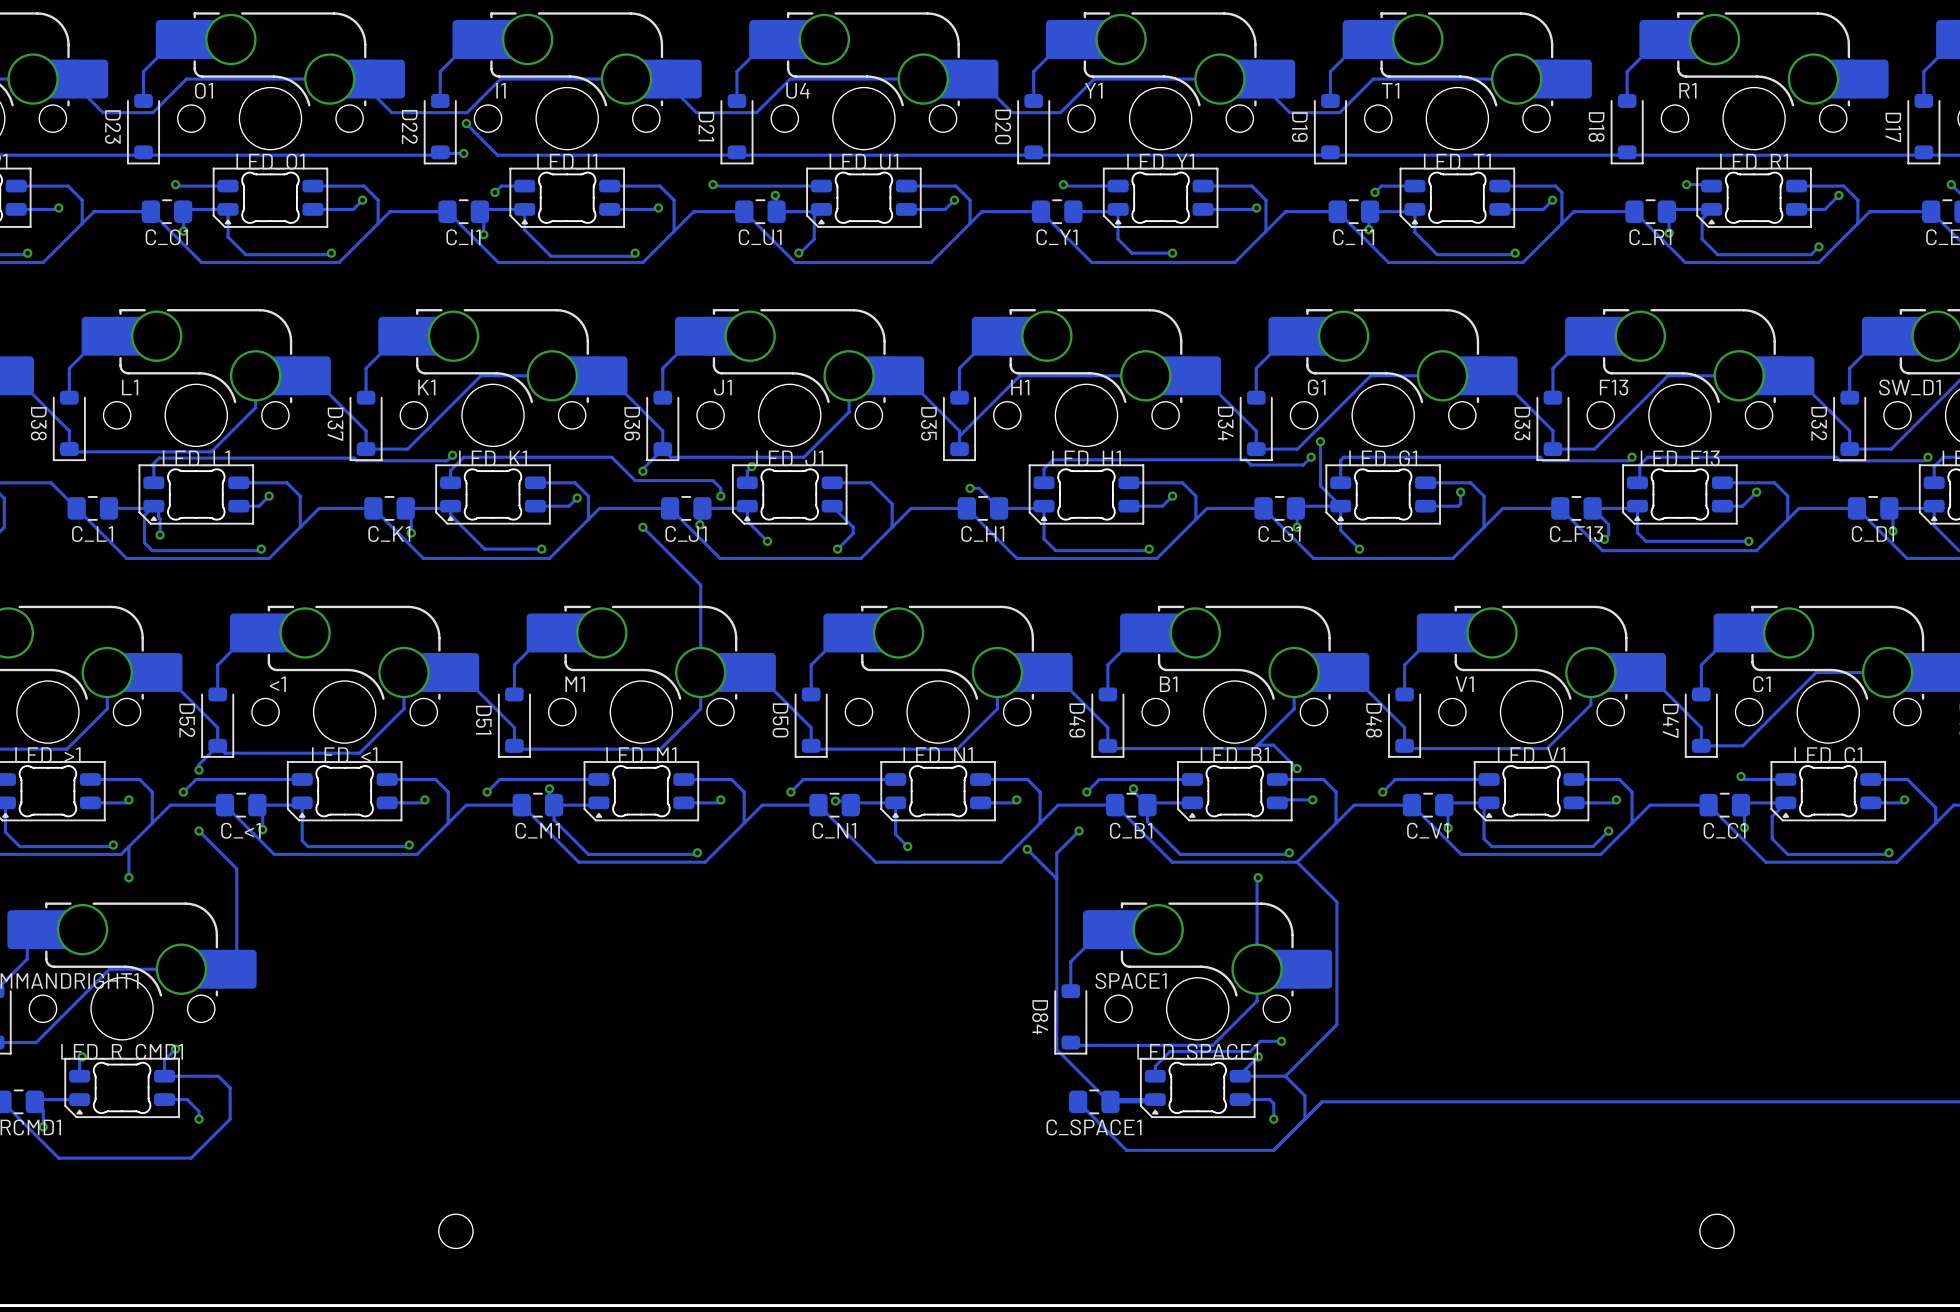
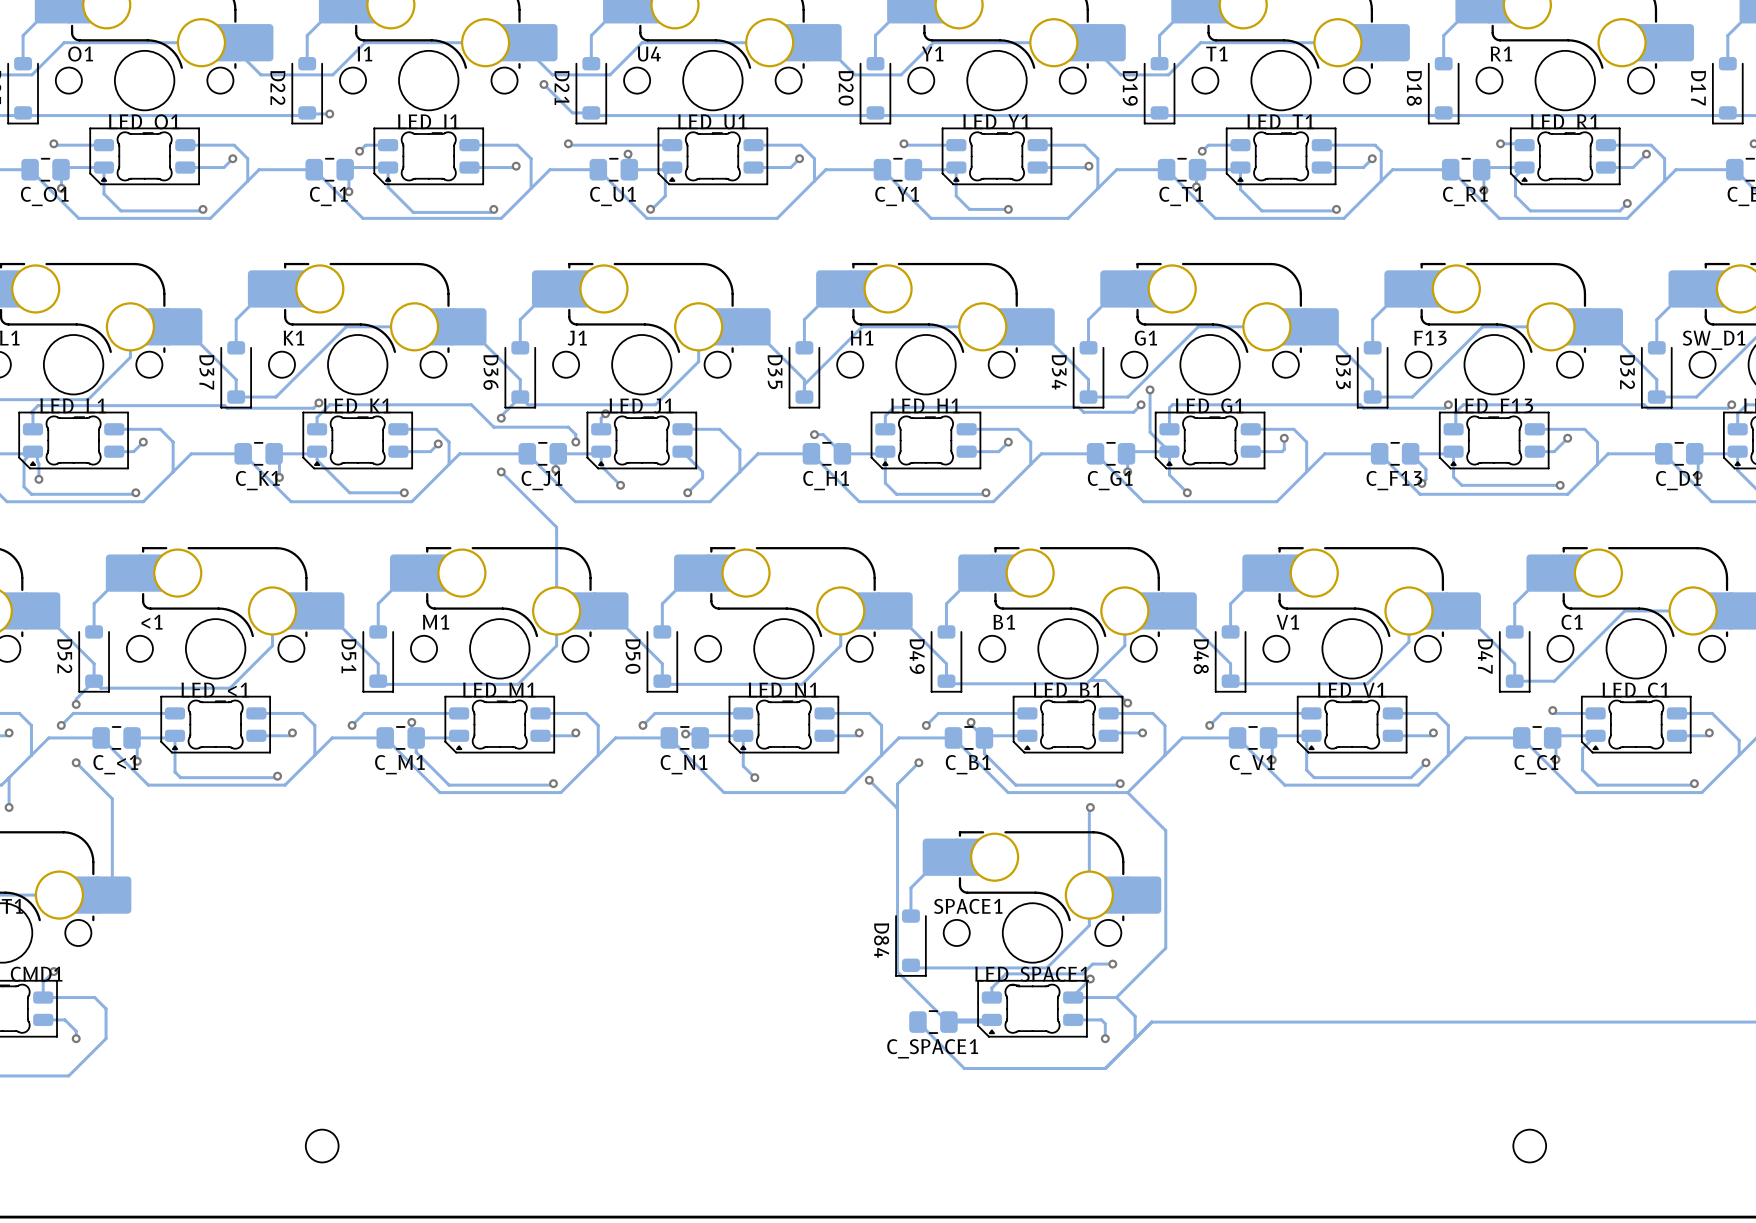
via: none -> (543, 84)
track: (466, 123) (497, 155) (734, 155) (736, 152) -> (543, 84) (572, 112) (591, 112)
via: (466, 123) -> none

